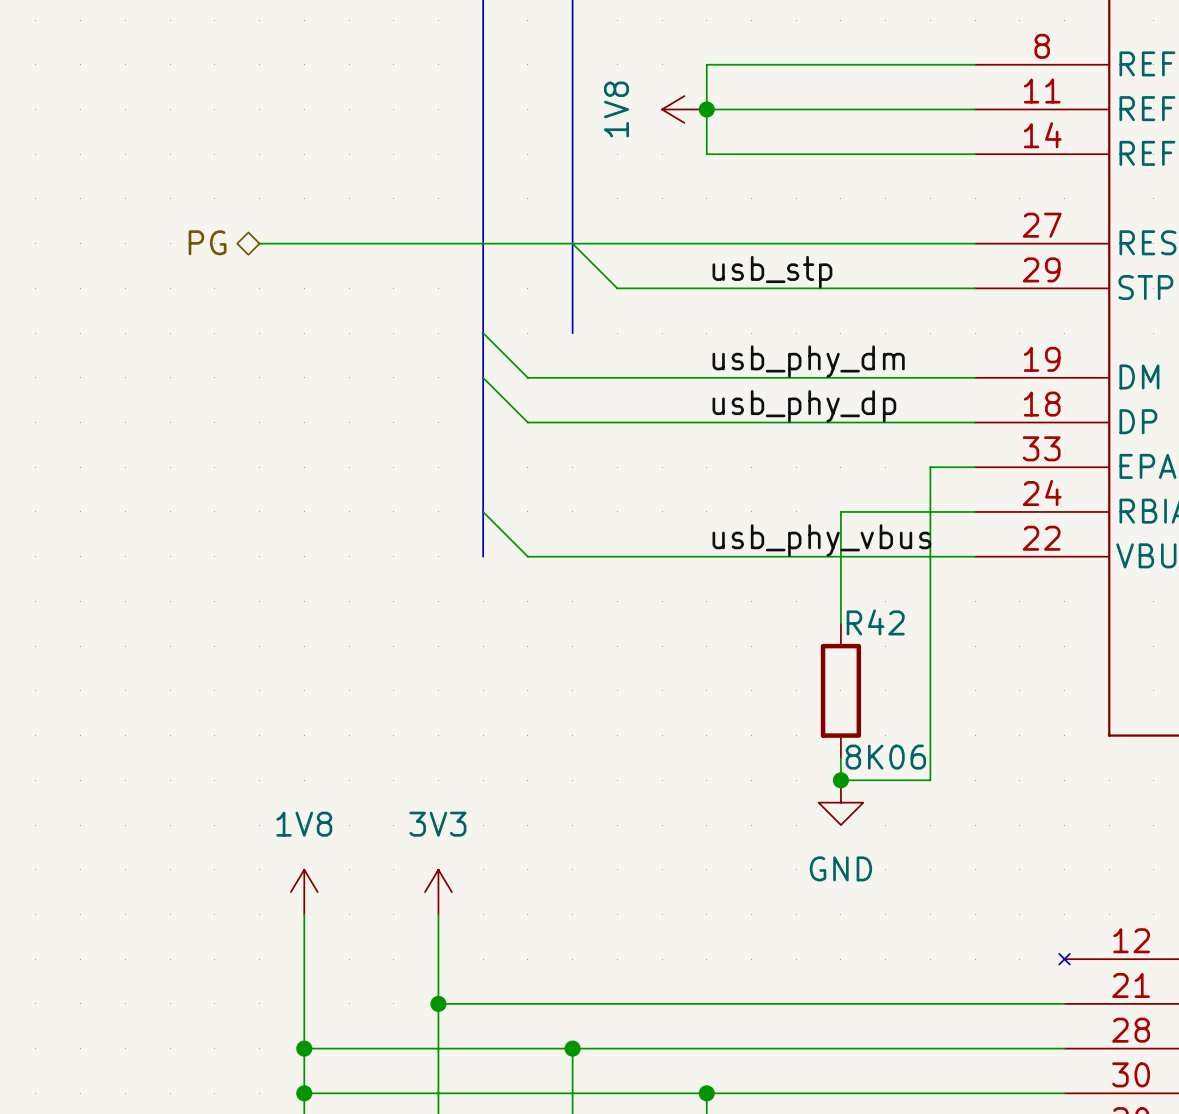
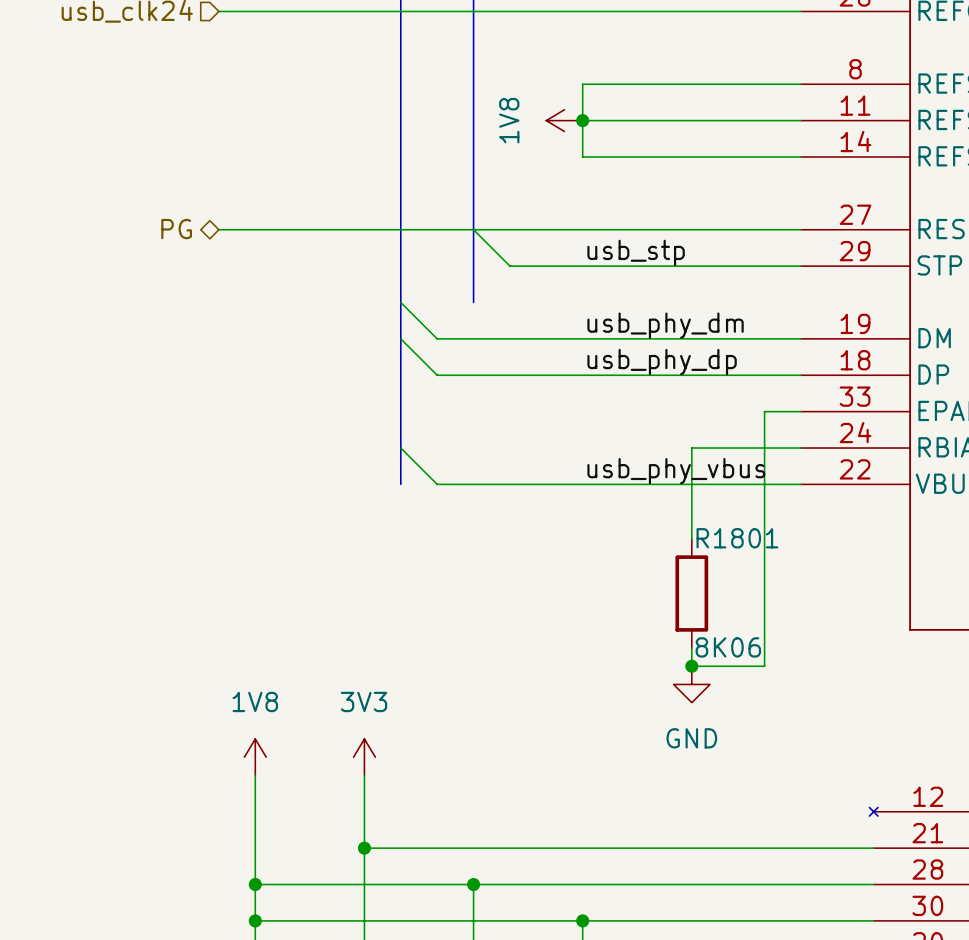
R42 name: R42 (875, 622) -> R1801 (737, 538)

